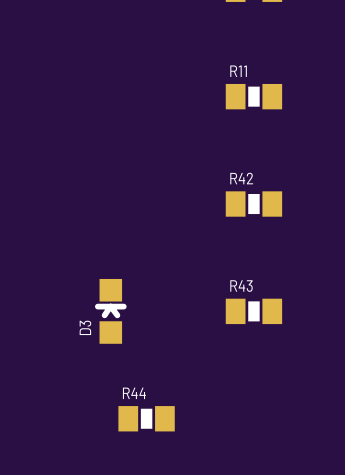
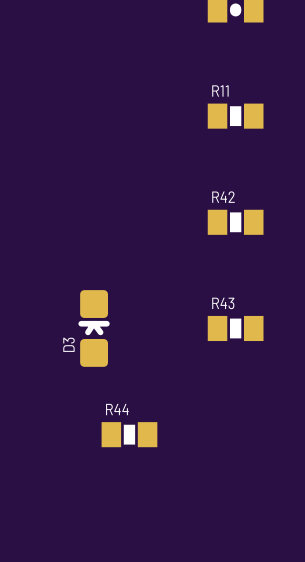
D3 footprint: [94, 278, 127, 344] -> [78, 290, 110, 367]

